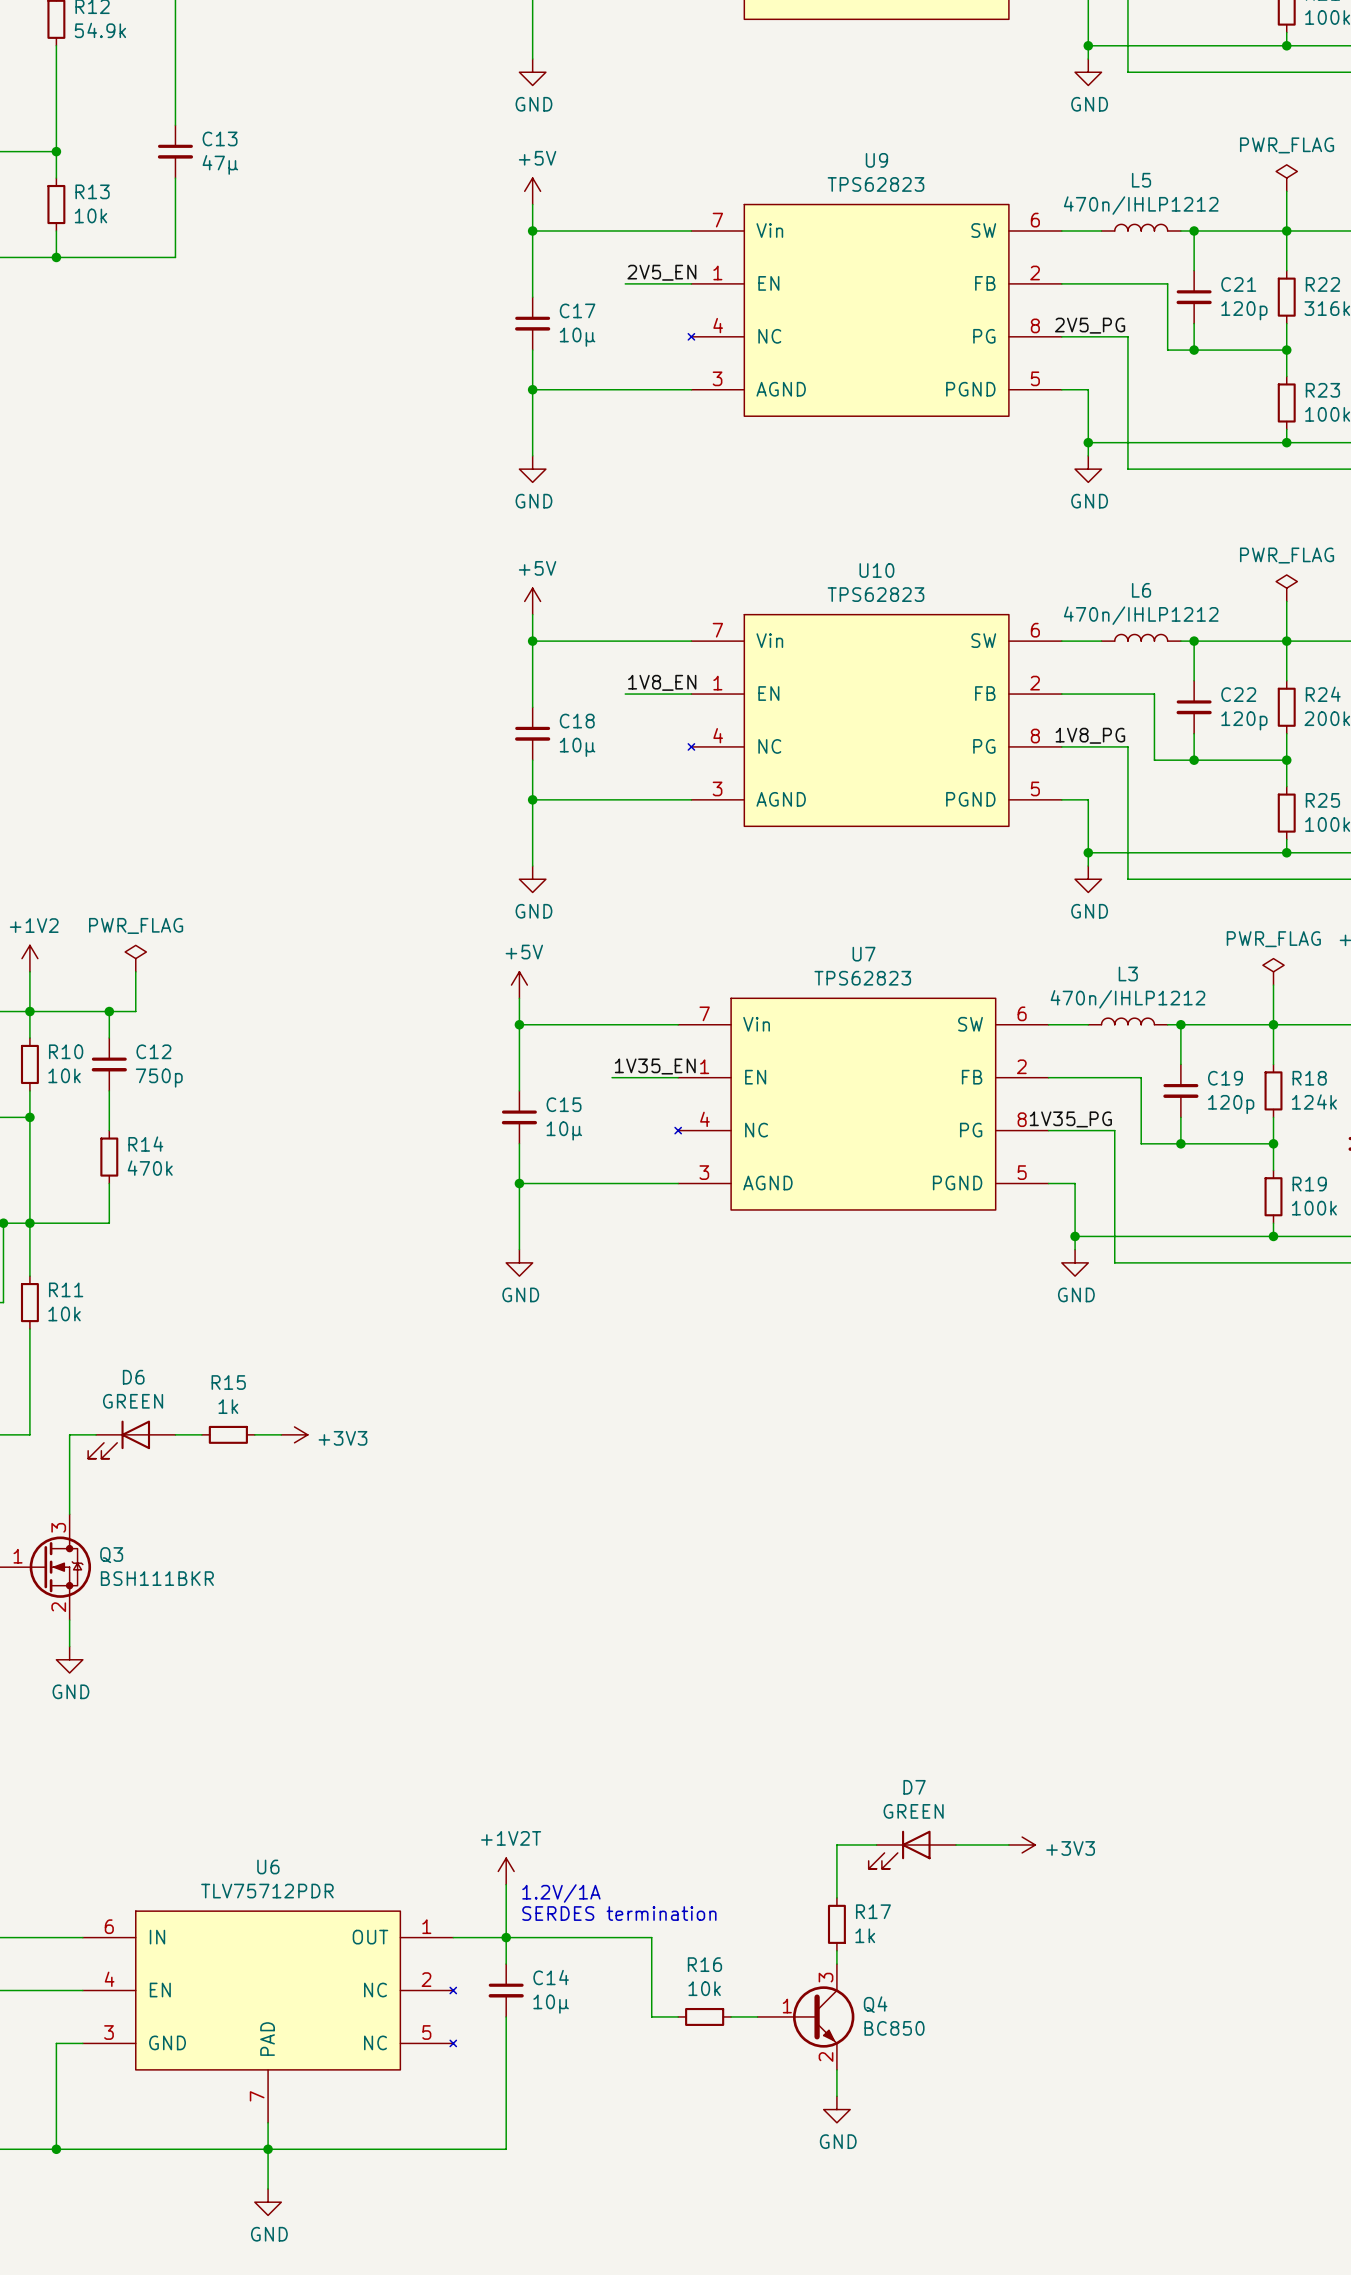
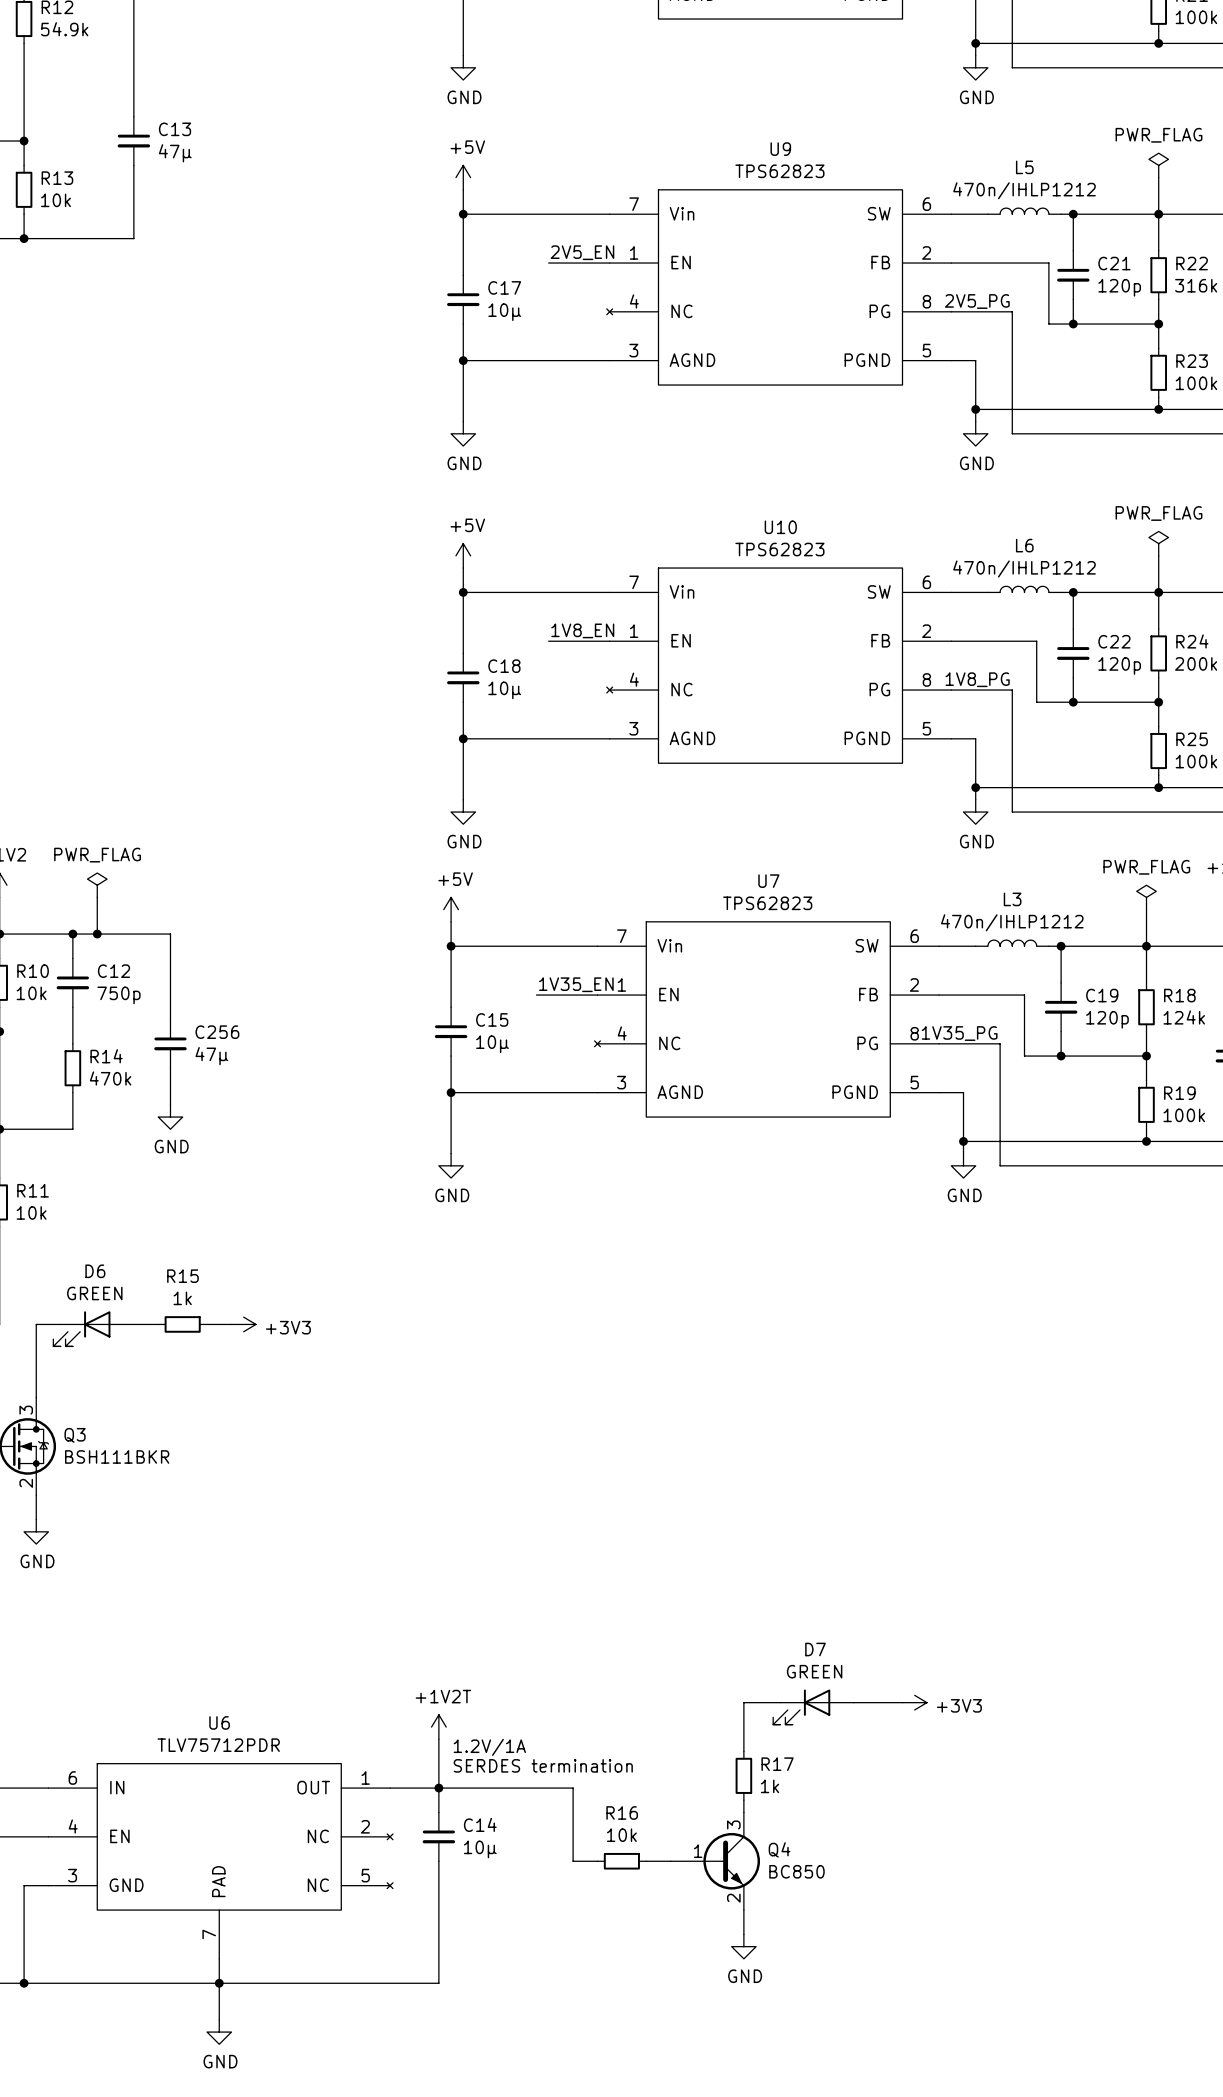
wire: none -> (97, 934) (170, 934) (170, 1019)
junction: none -> (97, 934)
C256: none -> 47µ (170, 1043)
wire: none -> (170, 1068) (170, 1104)
power symbol: none -> GND (170, 1117)

